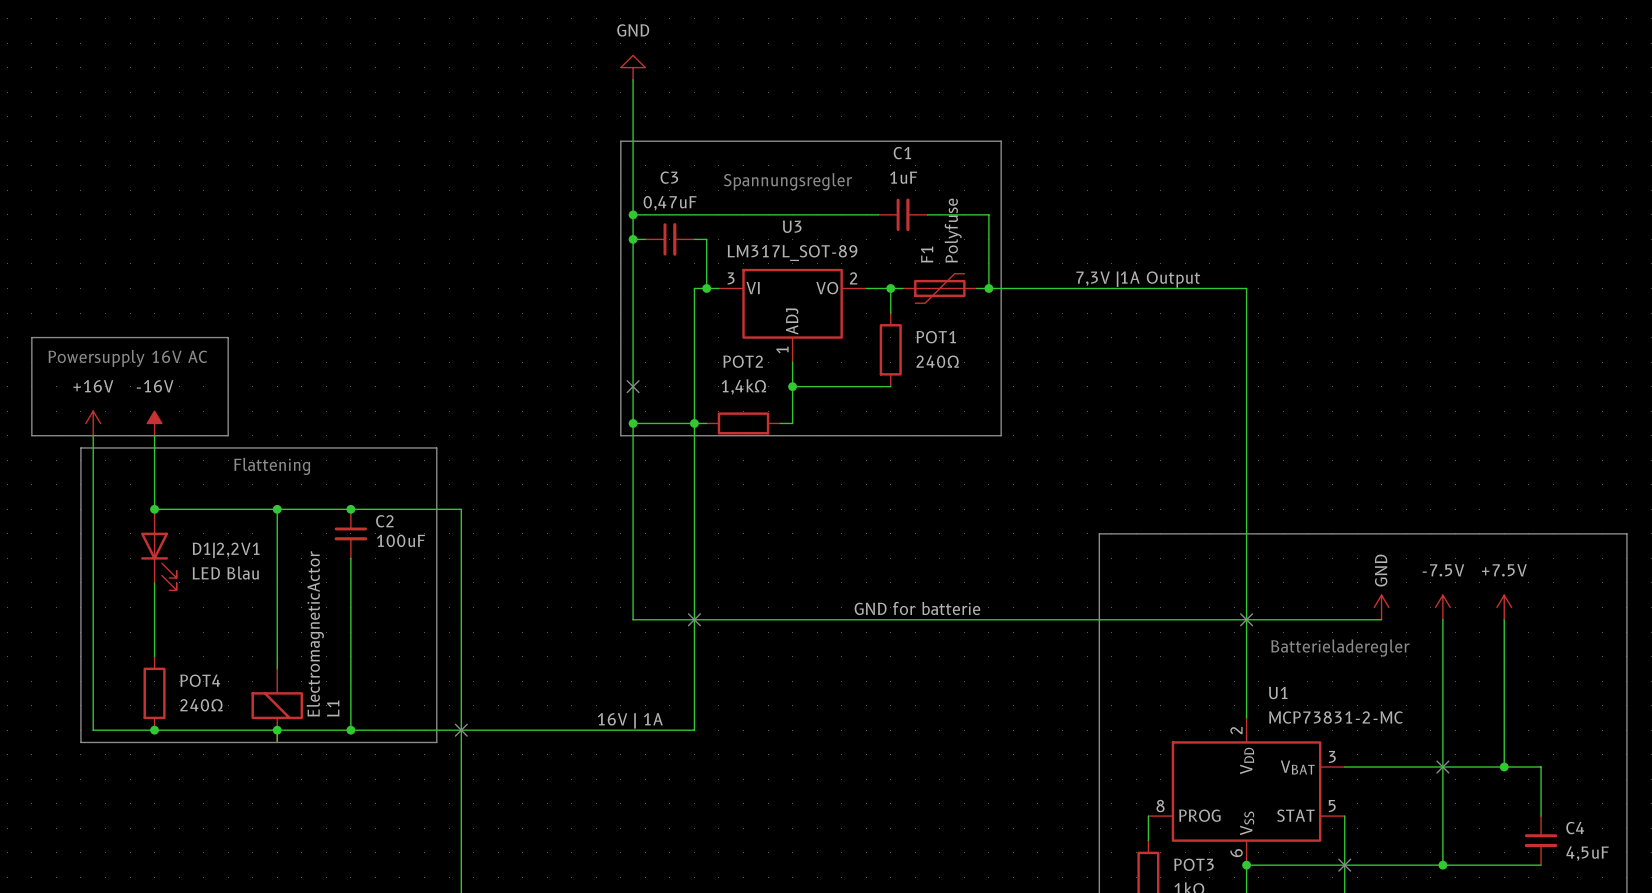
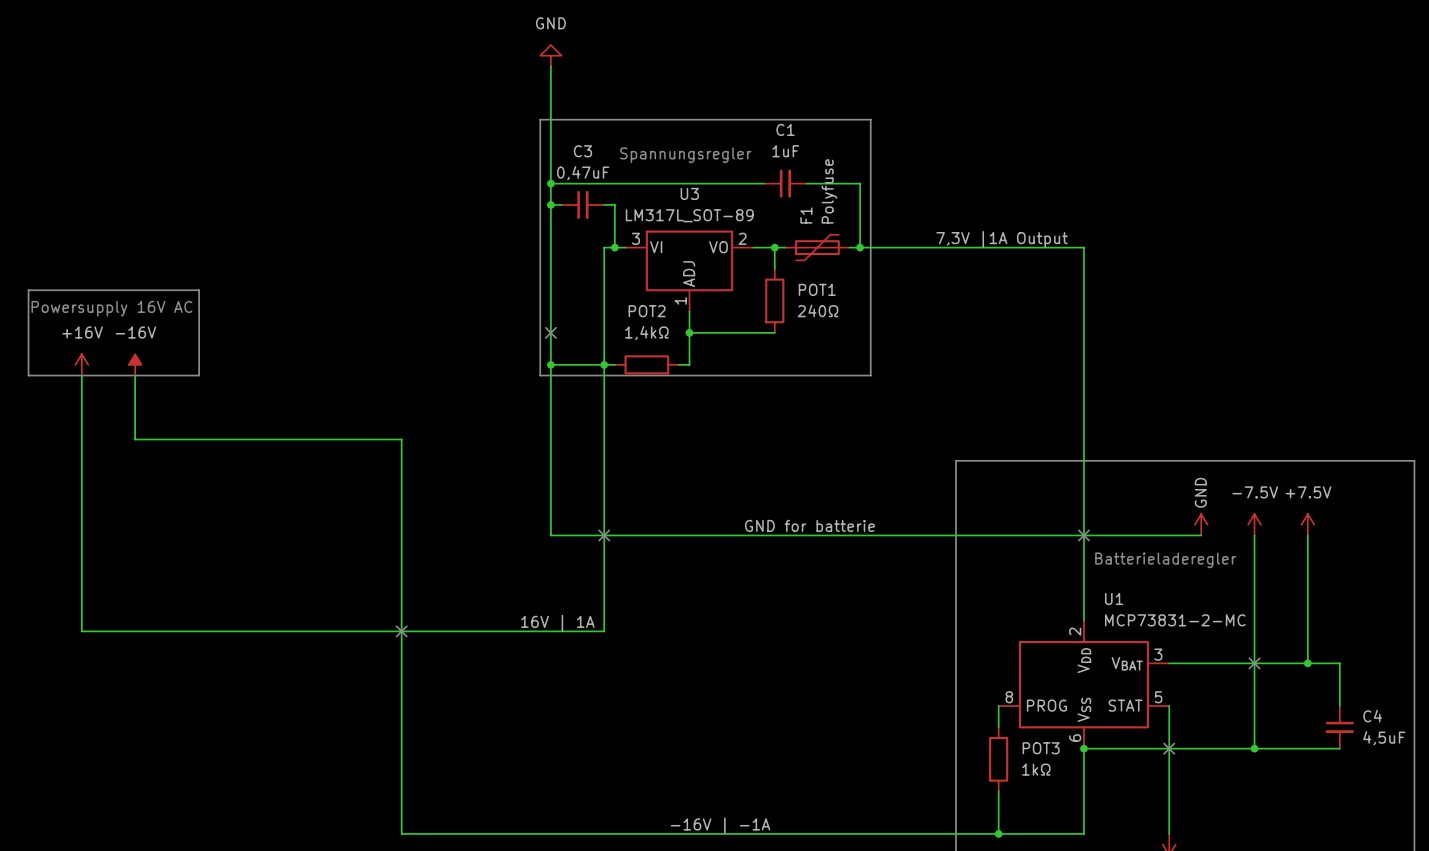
line: (80, 447) (436, 447) (436, 742) (80, 742) (80, 447) -> none
text: Flattening (272, 466) -> none
junction: (154, 509) -> none
wire: (277, 509) (277, 668) -> none
junction: (277, 509) -> none
junction: (350, 509) -> none
C2: 100uF (350, 533) -> none
D1|2,2V1: LED Blau (158, 549) -> none
wire: (350, 558) (350, 730) -> none
wire: (154, 582) (154, 656) -> none
POT4: 240Ω (154, 693) -> none
L1: ElectromagneticActor (277, 705) -> none
junction: (154, 730) -> none
wire: (277, 730) (277, 742) -> none
junction: (277, 730) -> none
junction: (350, 730) -> none

